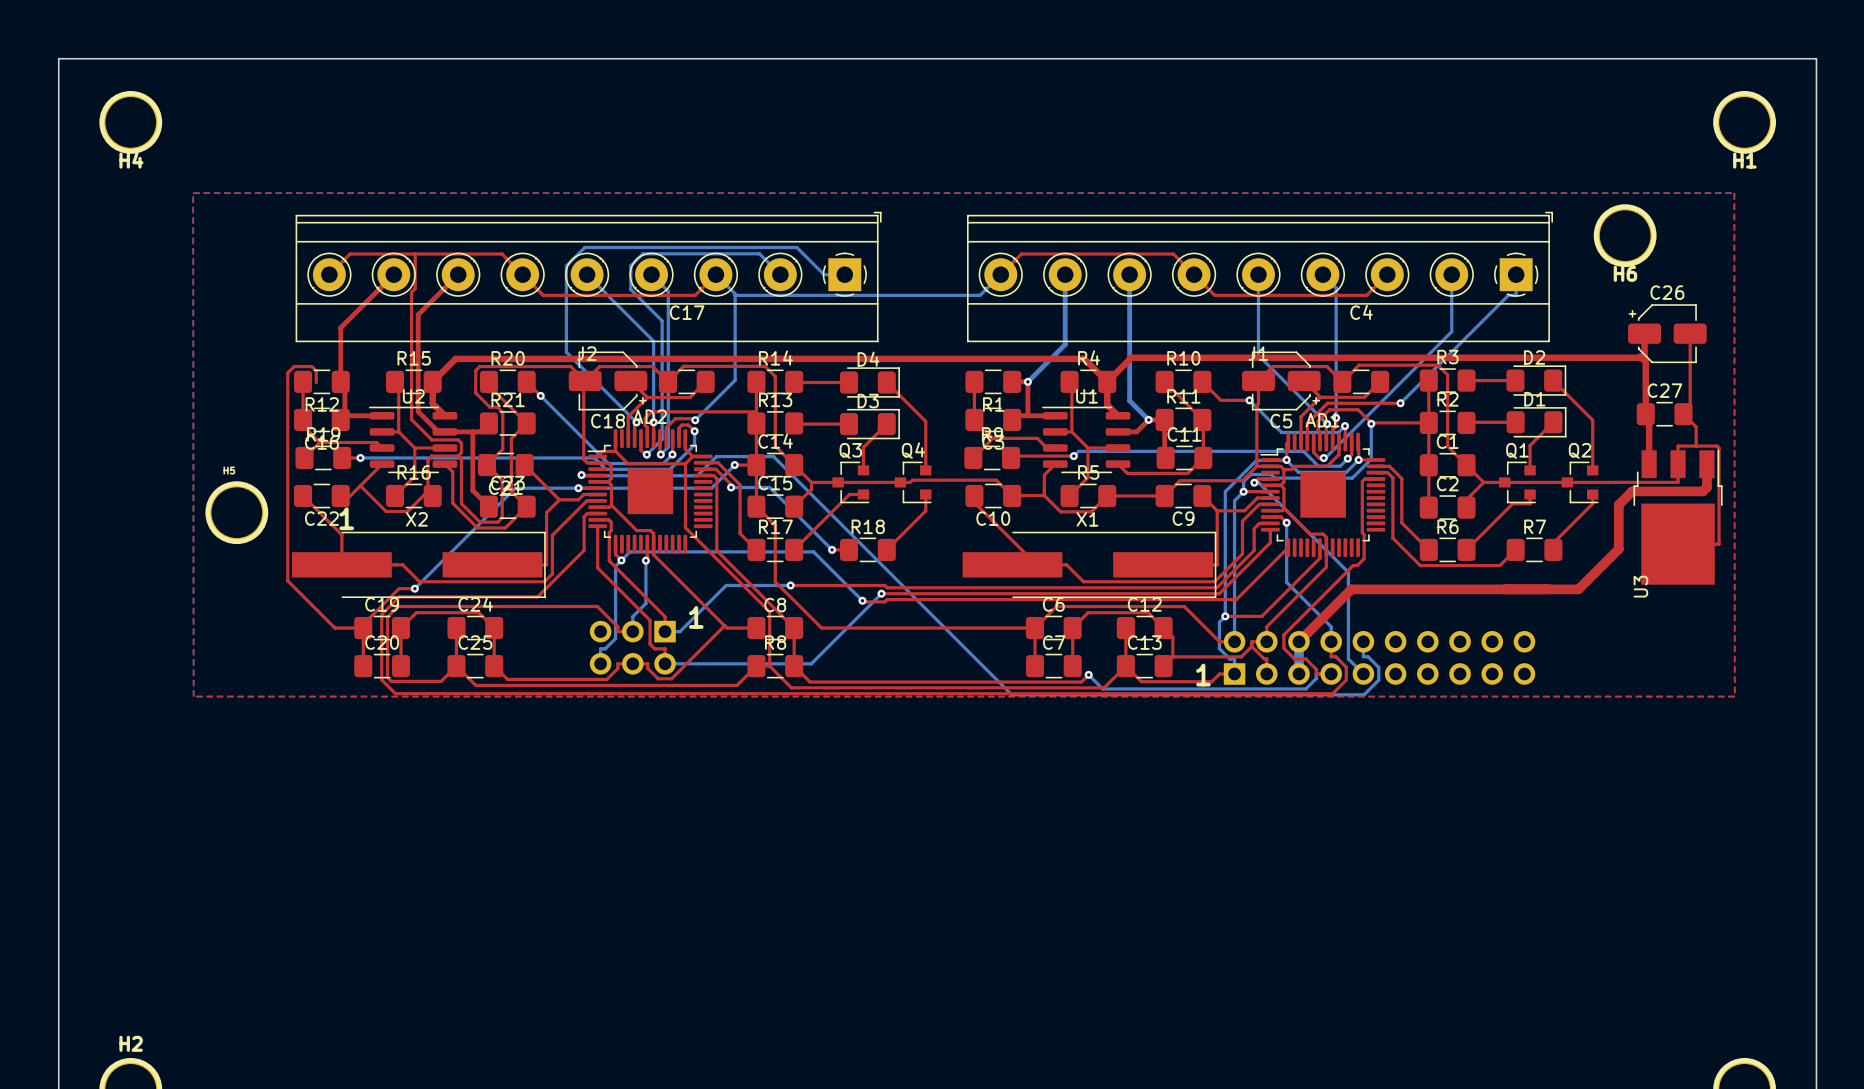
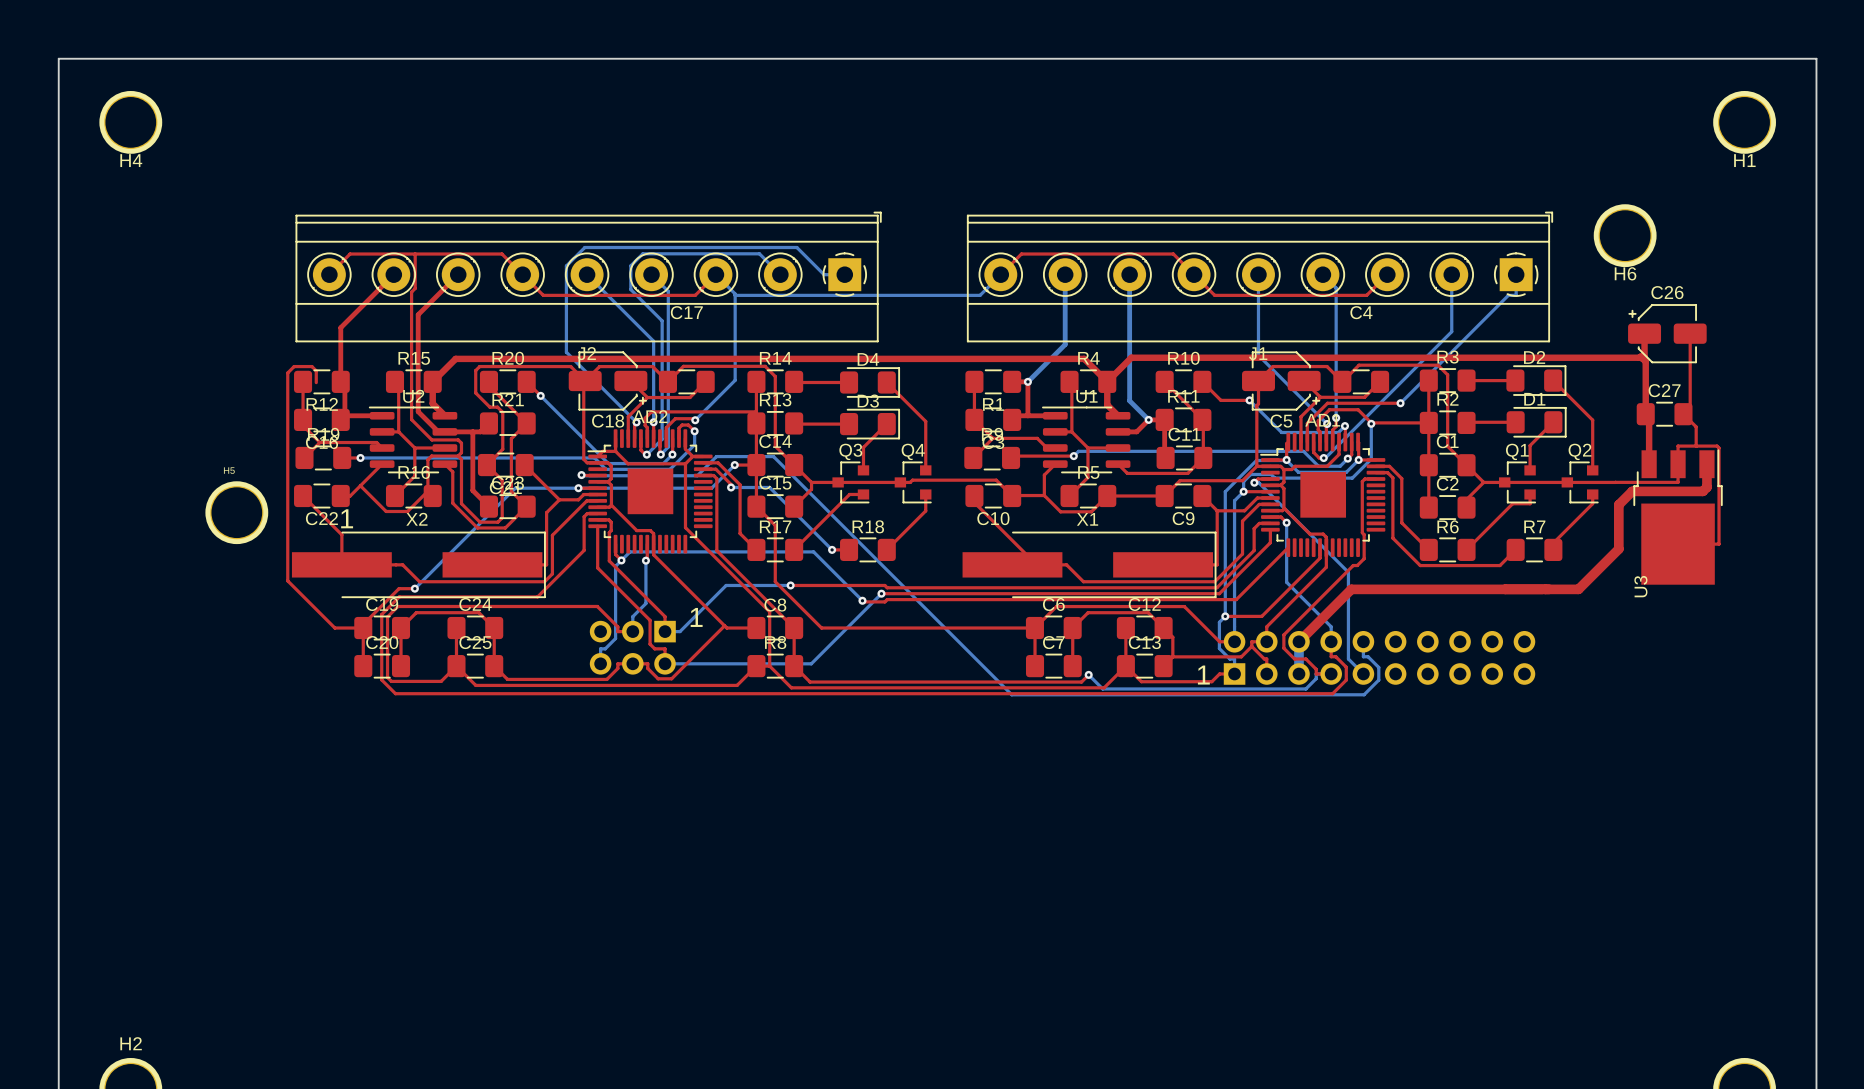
top zone outline: (193, 193) (193, 696) (1734, 696) (1734, 193) (193, 193) -> none

